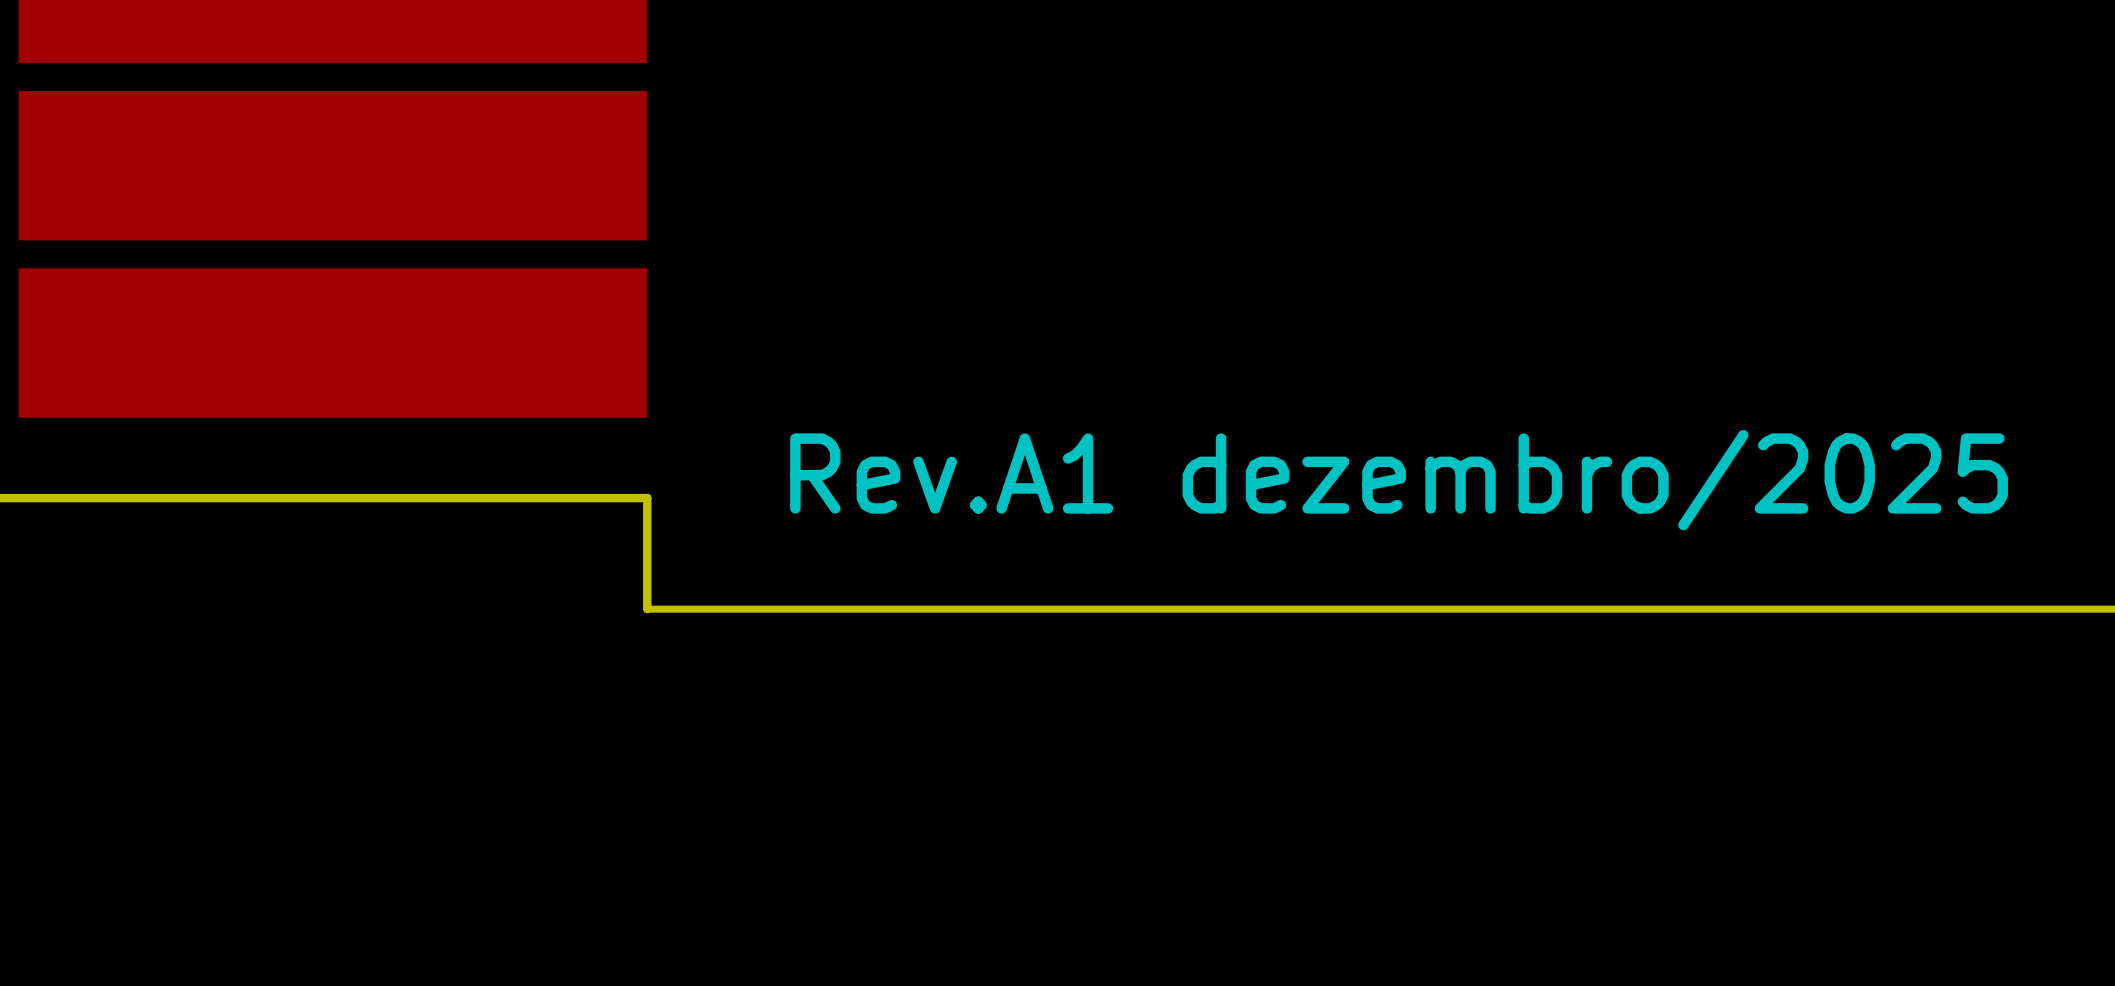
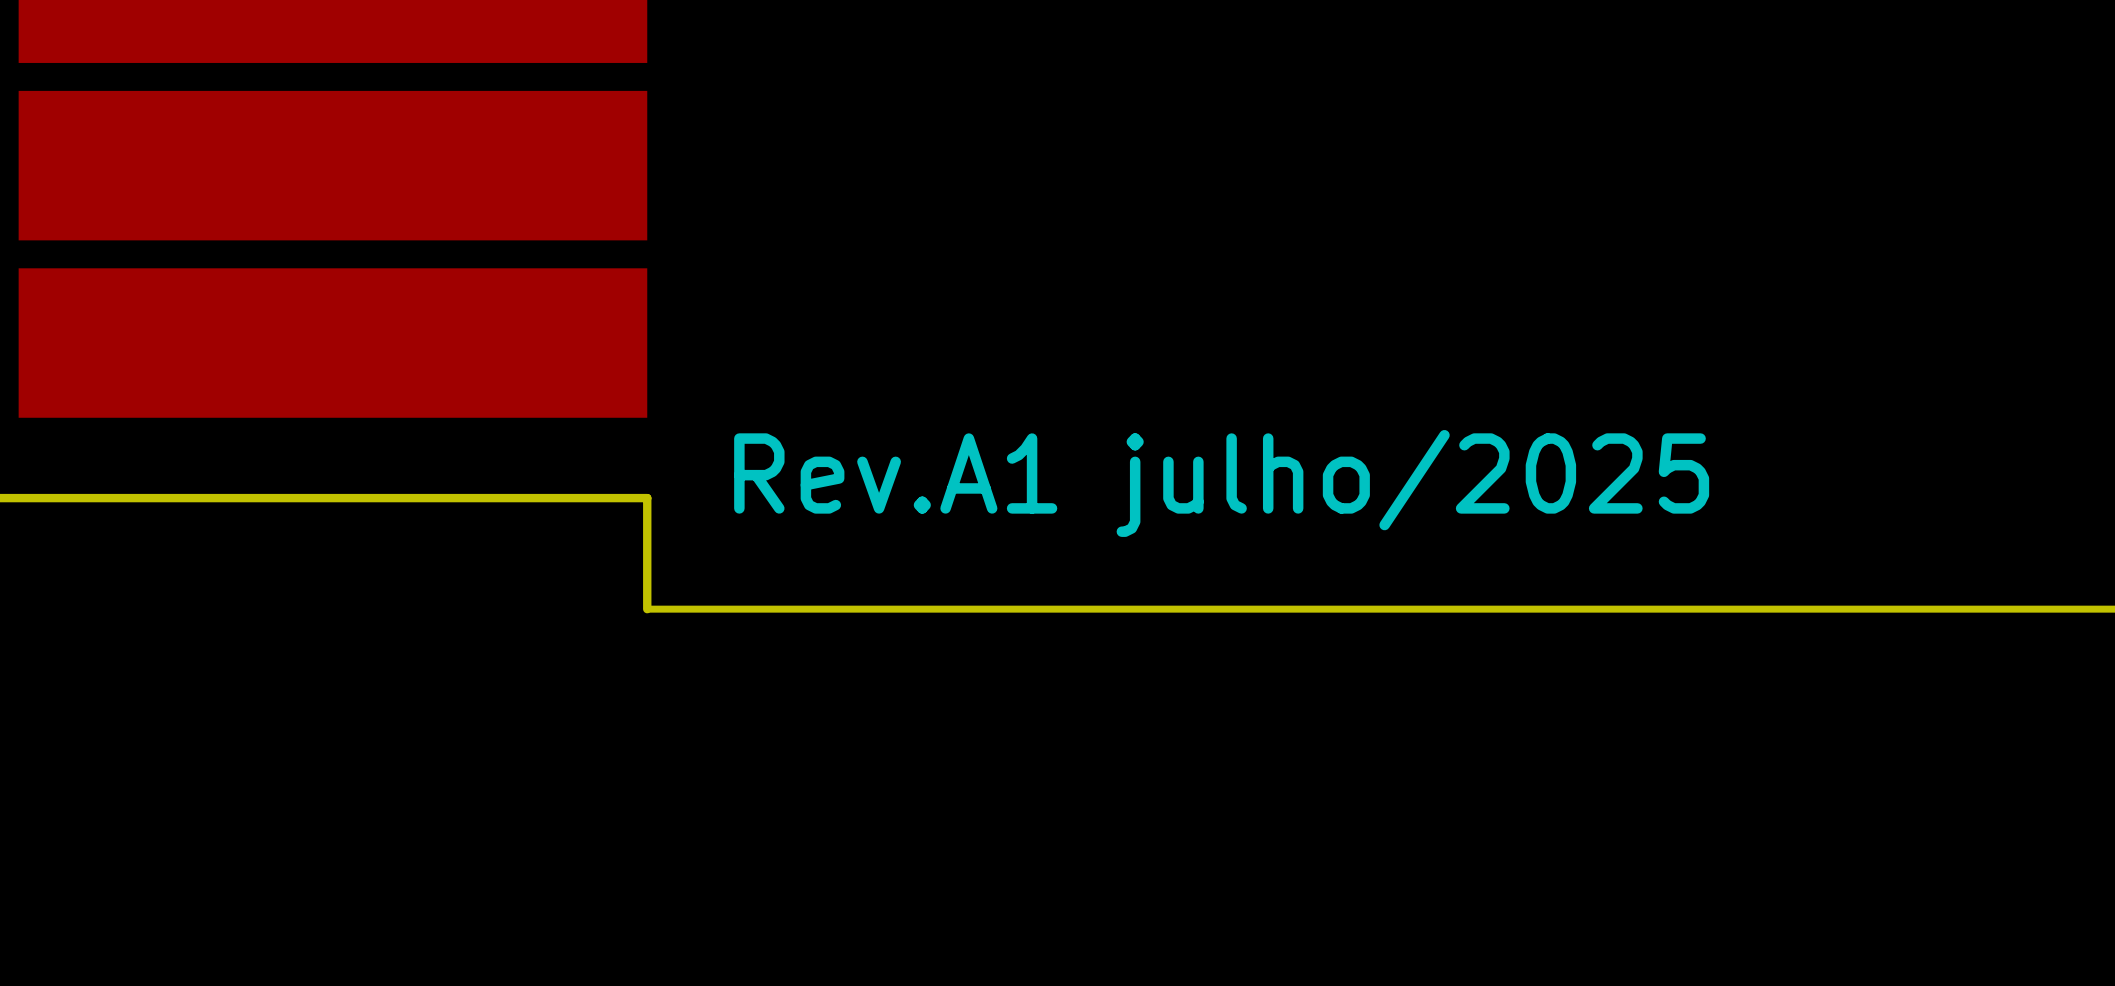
text: Rev.A1 dezembro/2025 (1399, 480) -> Rev.A1 julho/2025 (1221, 483)

